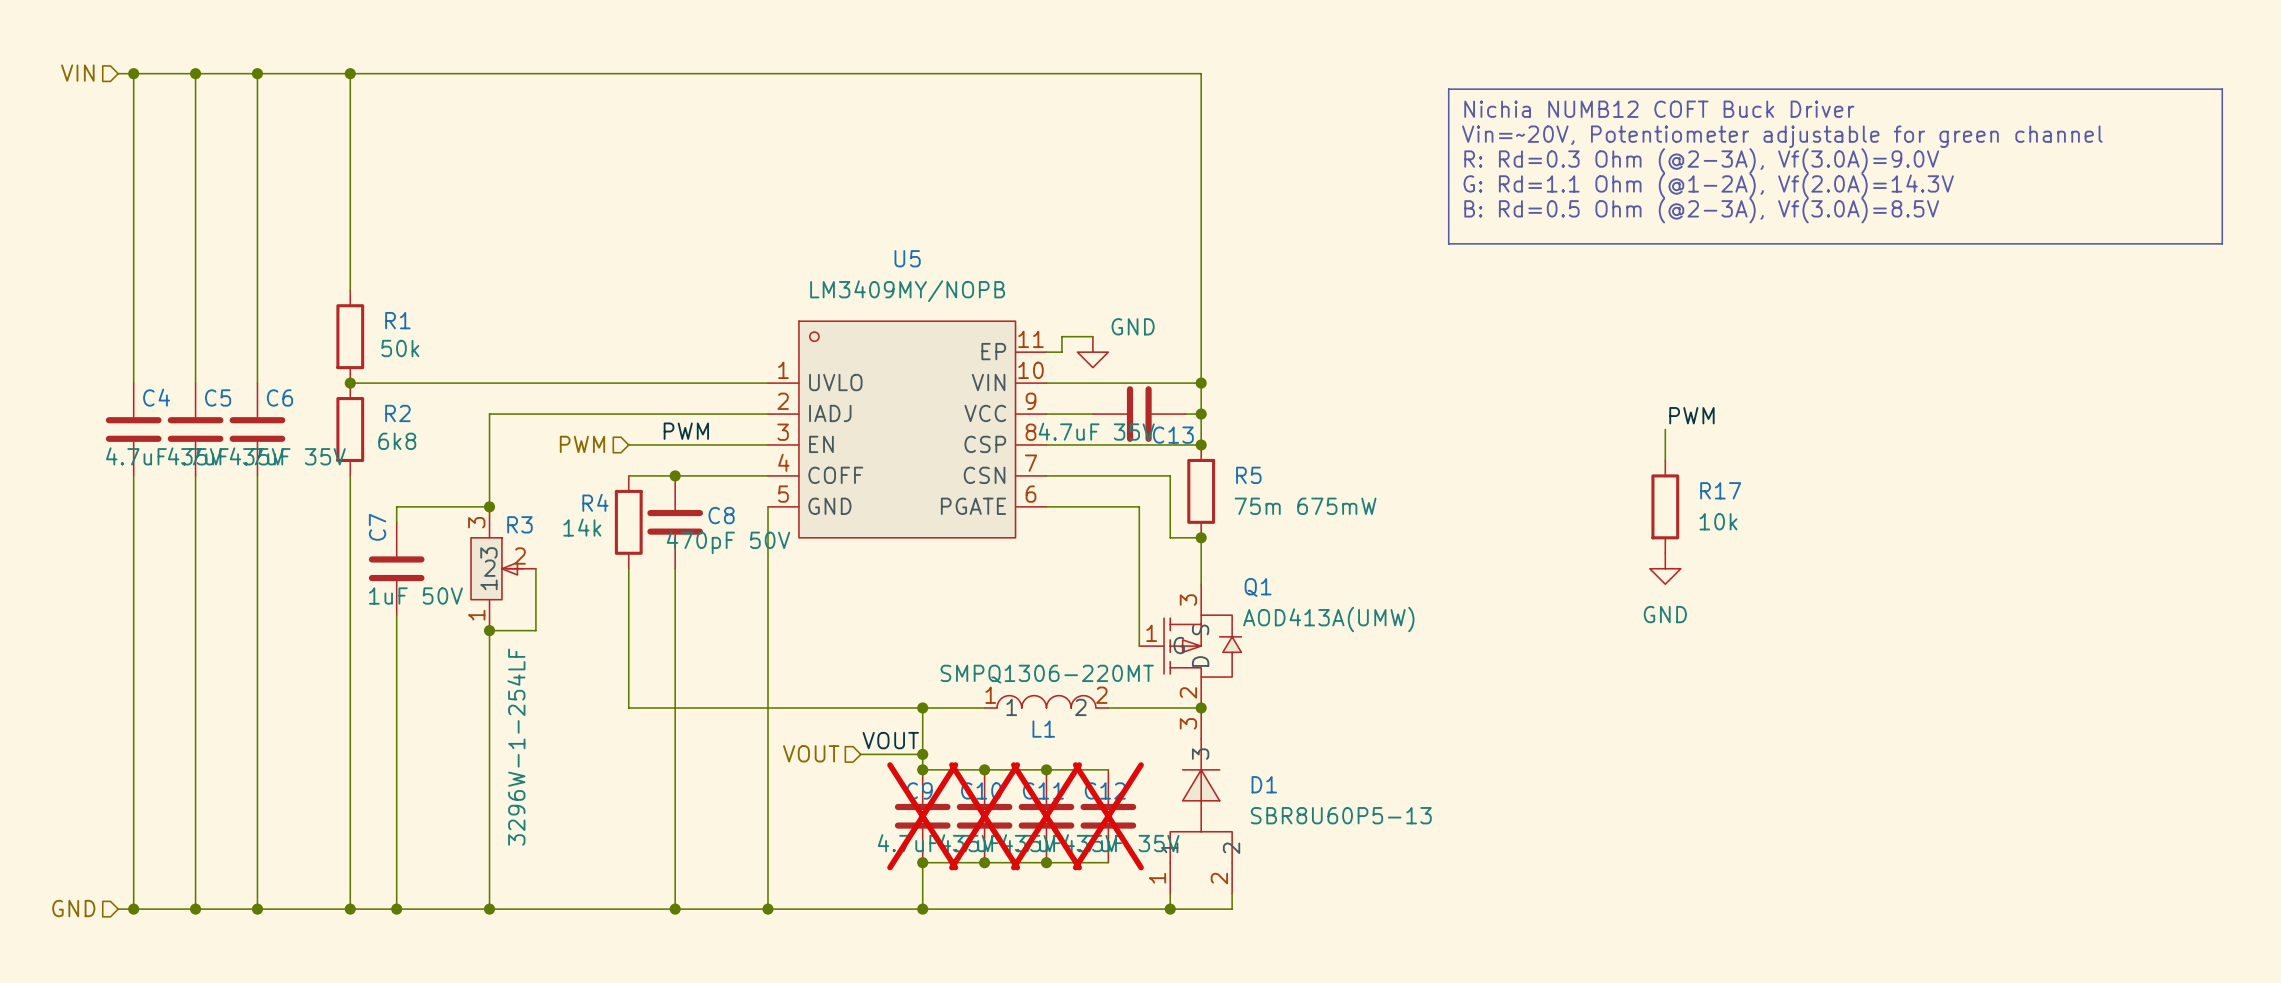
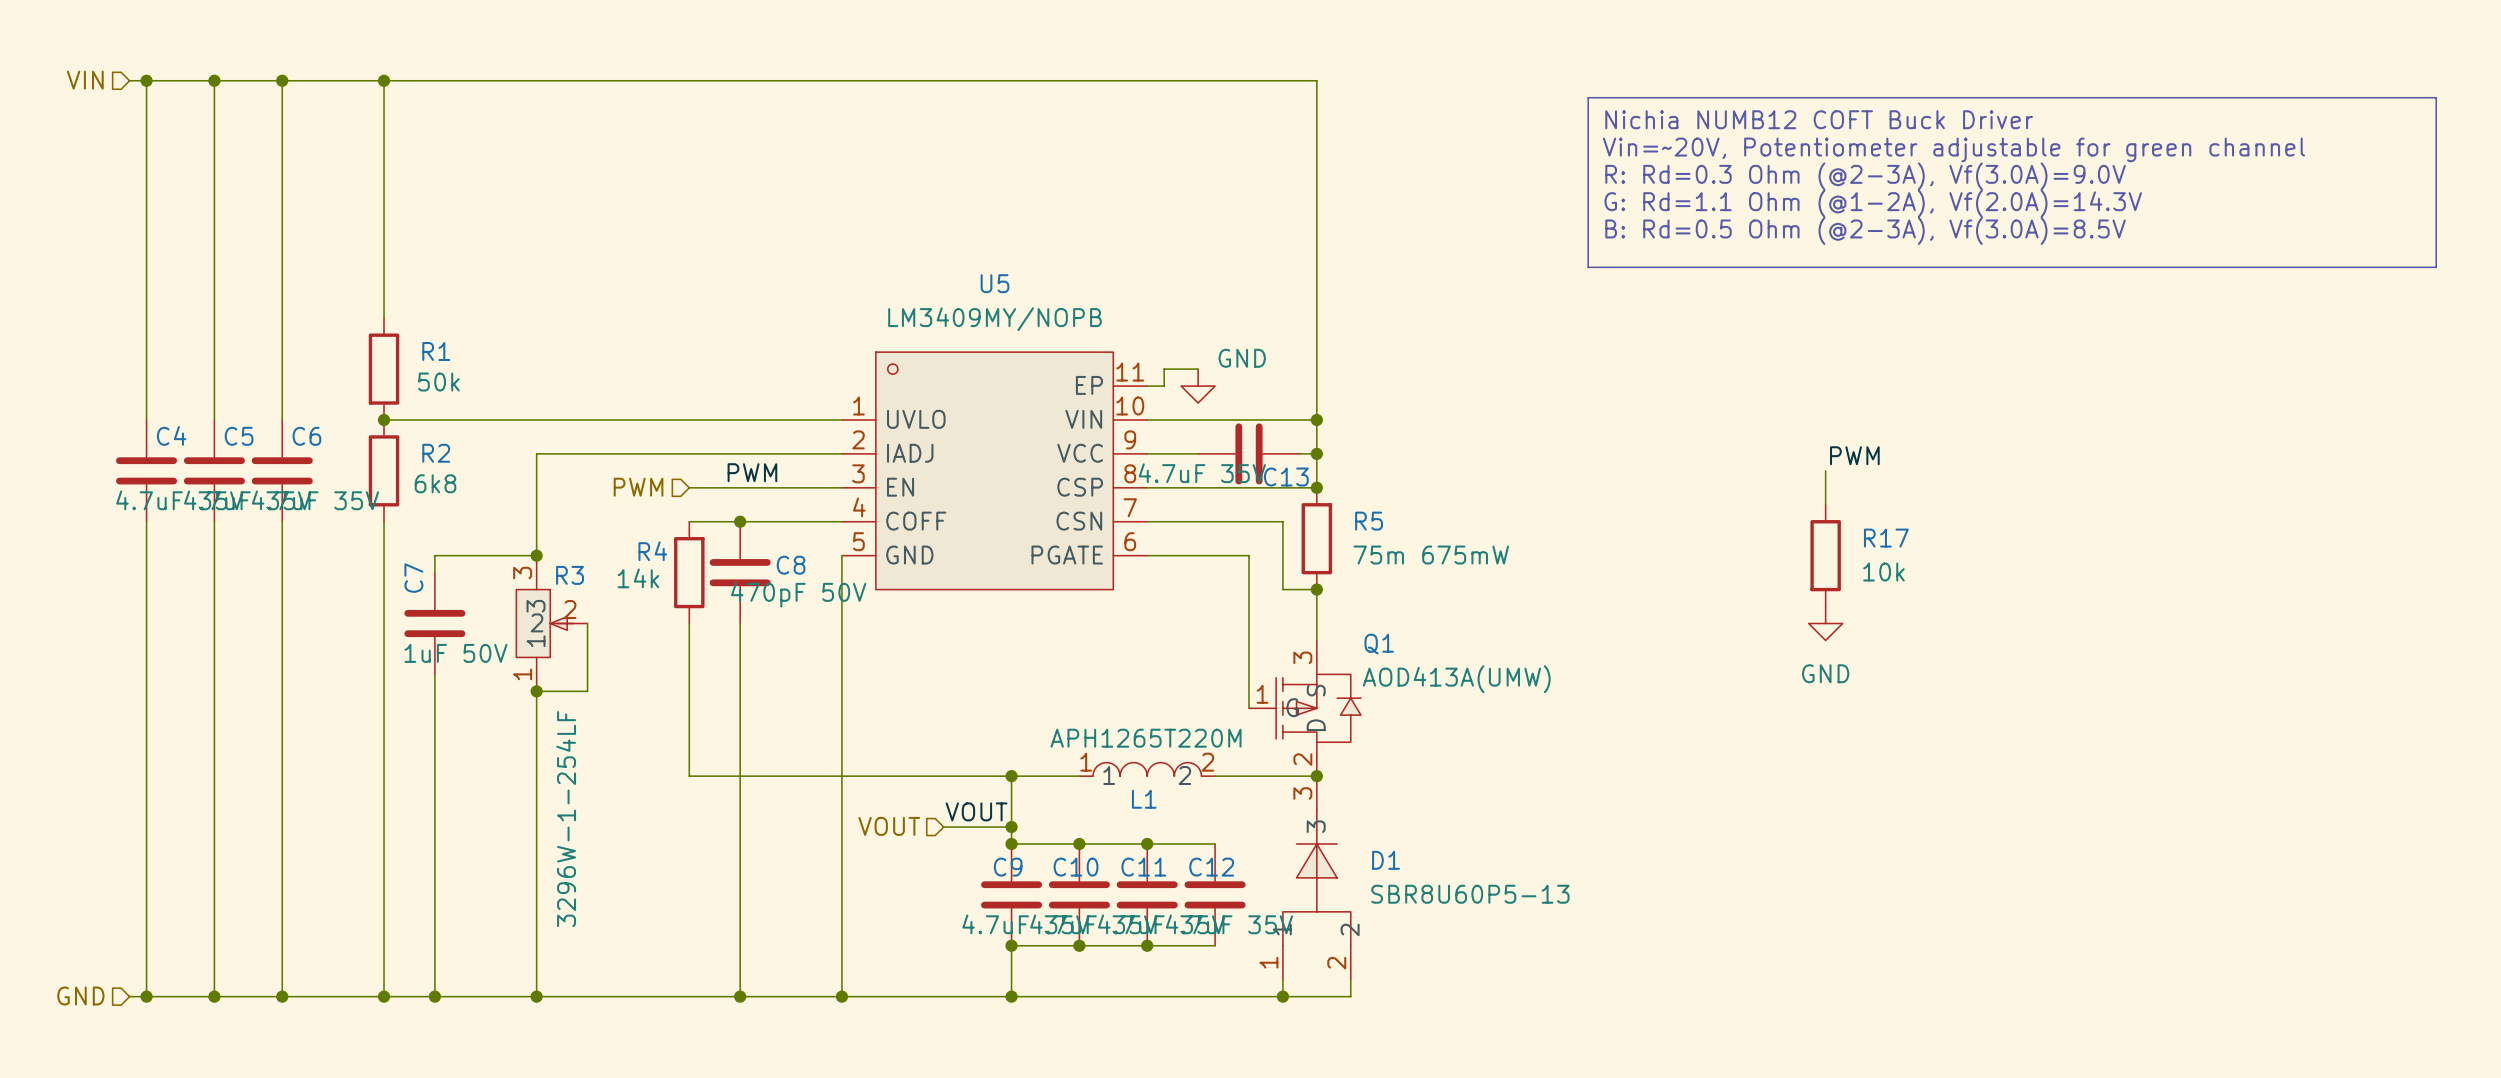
L1 value: SMPQ1306-220MT (1047, 674) -> APH1265T220M (1146, 738)
C9 do-not-place cross: (922, 816) -> none
C10 do-not-place cross: (984, 816) -> none
C11 do-not-place cross: (1046, 816) -> none
C12 do-not-place cross: (1108, 816) -> none

